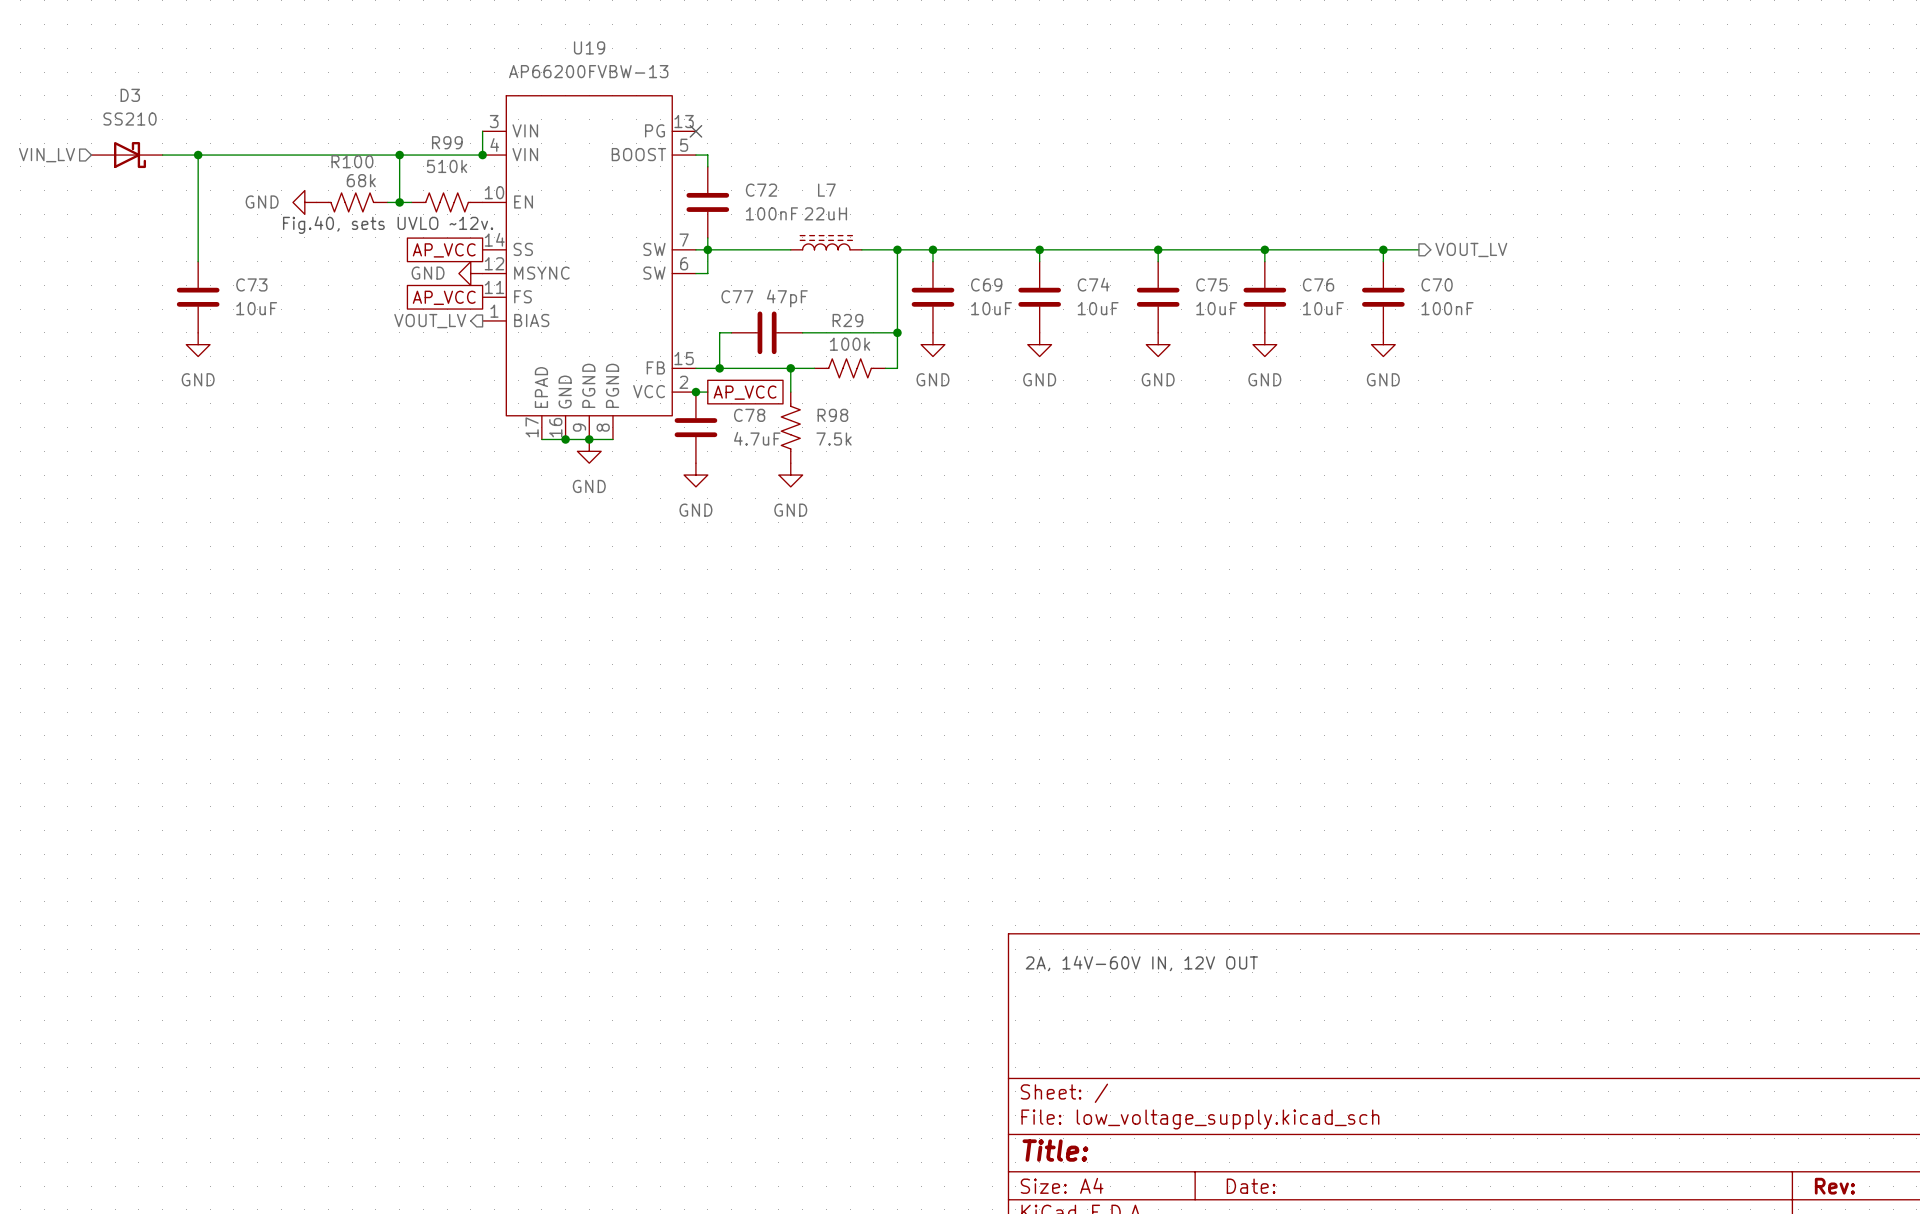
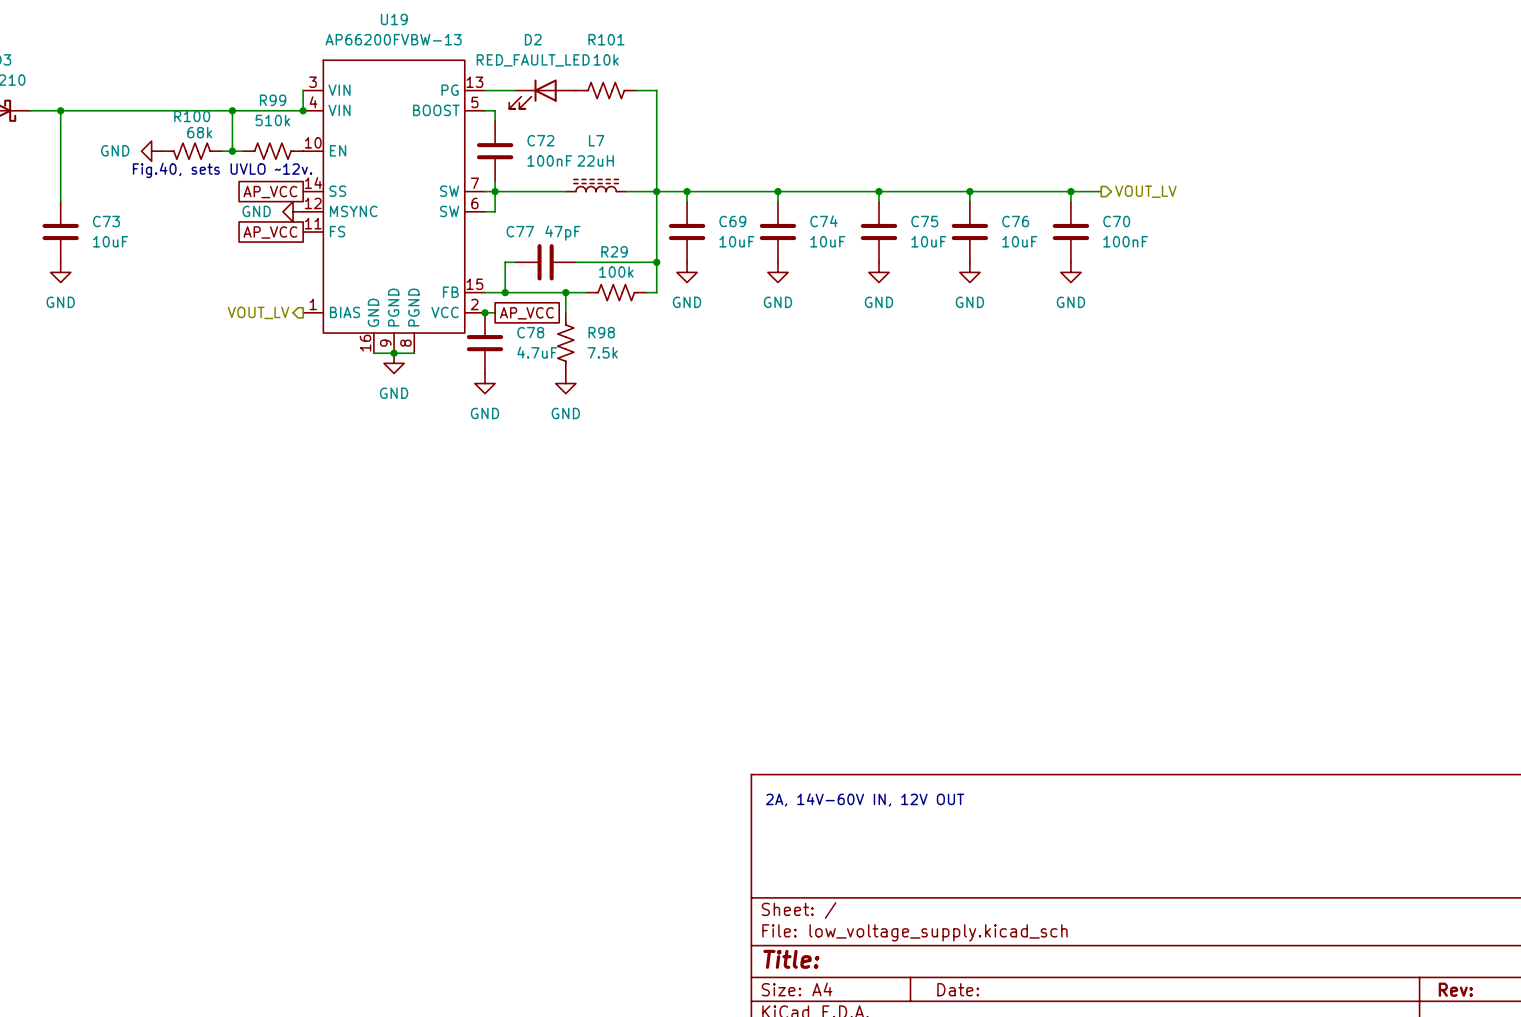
U19 symbol: [482, 95, 696, 440] -> [303, 60, 485, 354]
wire: none -> (484, 90) (515, 90)
no-connect mark: (695, 131) -> none
R101: none -> 10k (606, 90)
wire: none -> (636, 90) (656, 90) (656, 191)
D2: none -> RED_FAULT_LED (542, 94)
hierarchical label position: VOUT_LV (430, 321) -> VOUT_LV (258, 312)
wire: (541, 439) (565, 439) -> none
junction: (565, 439) -> none

